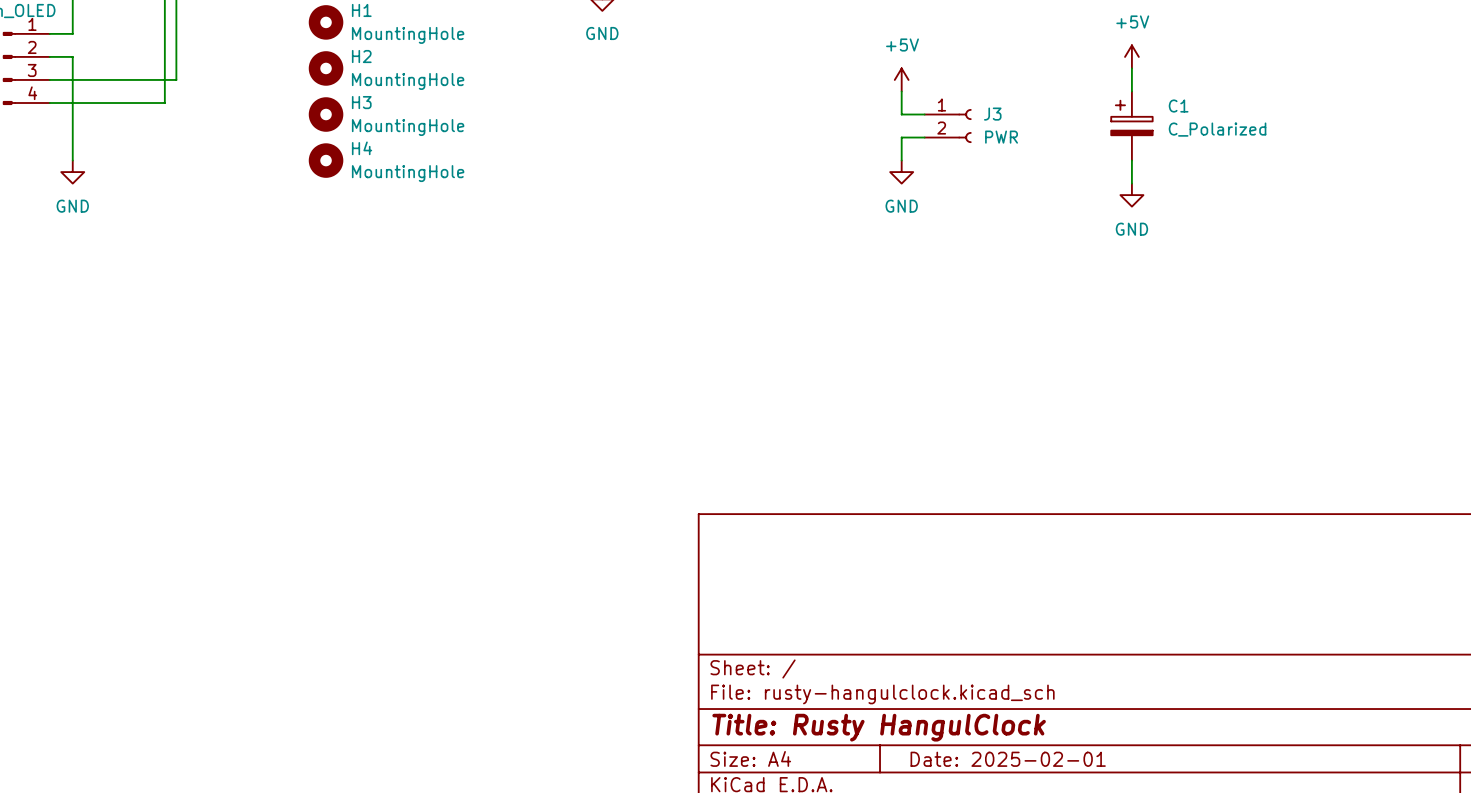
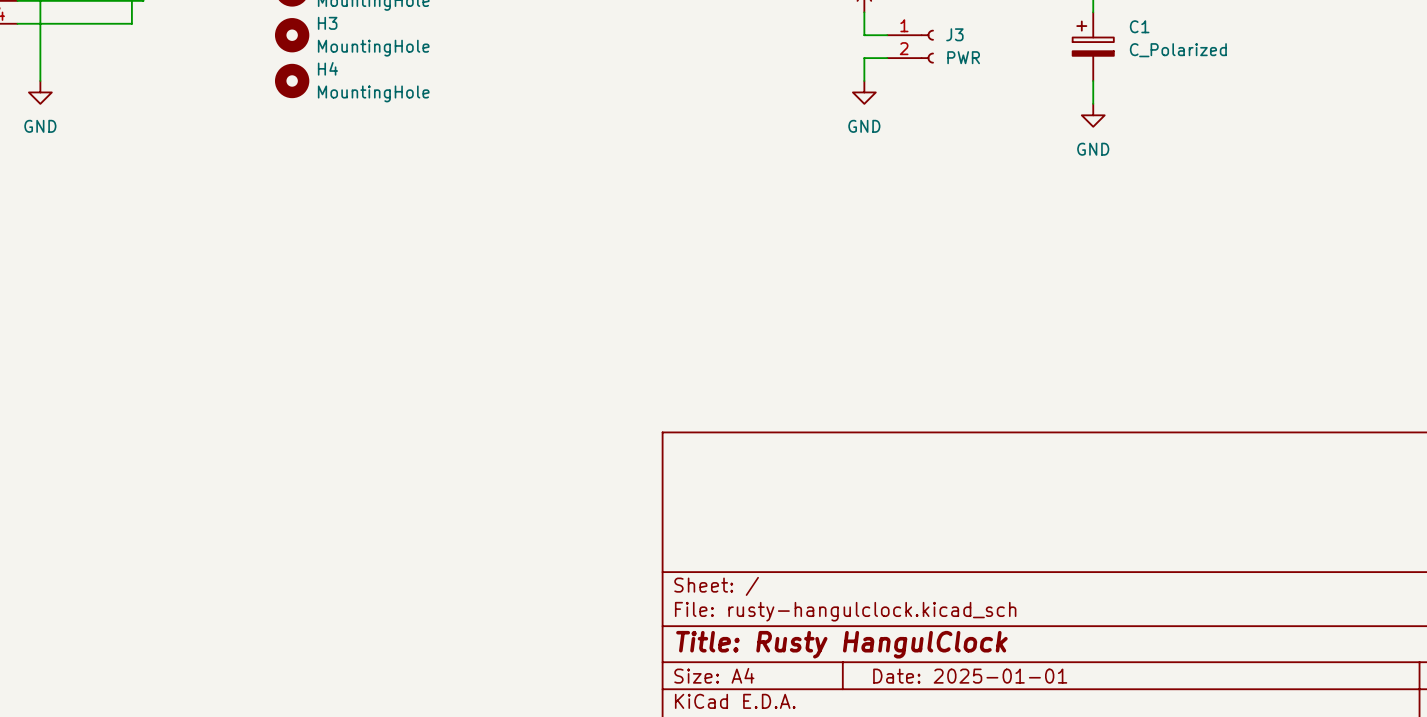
title block: Date: 2025-02-01 (1008, 759) -> Date: 2025-01-01 (970, 676)

